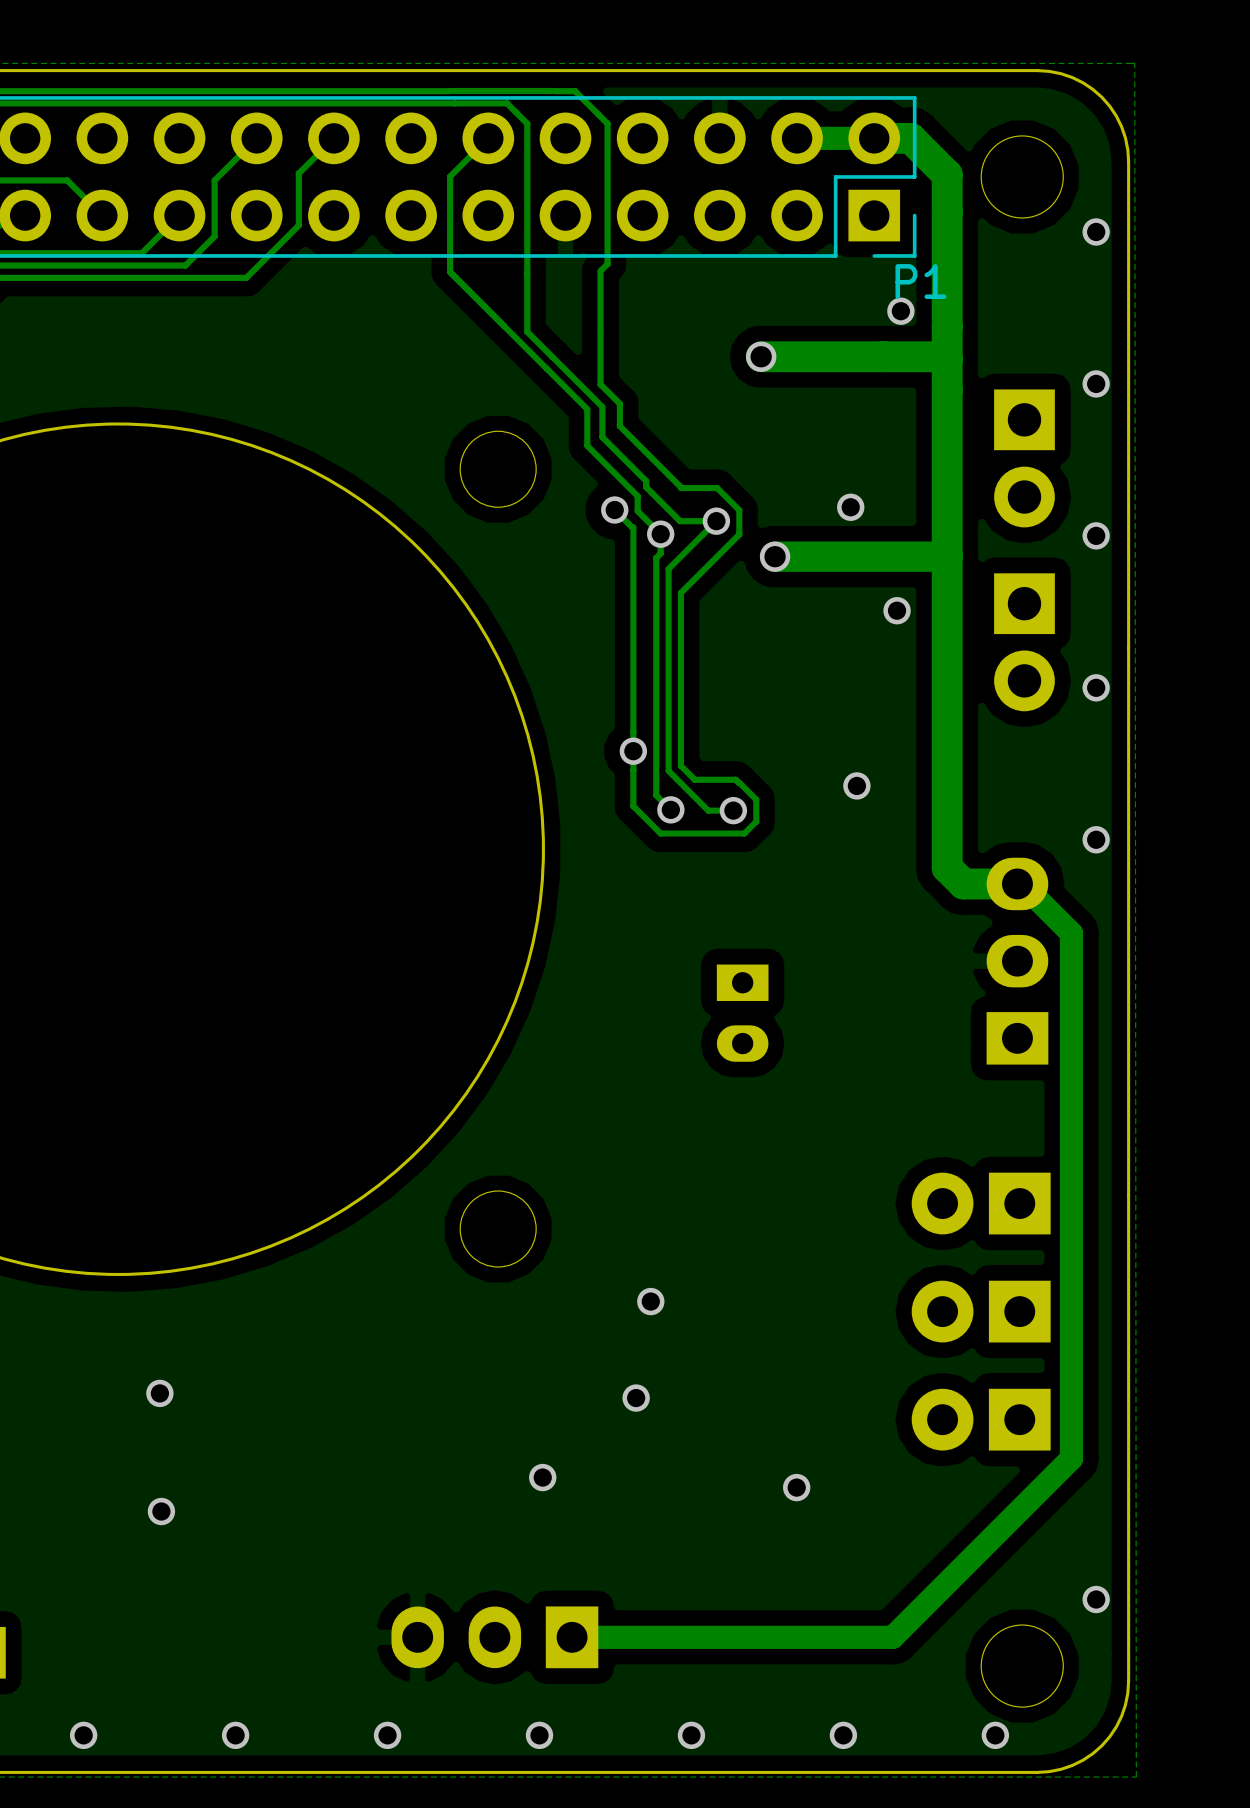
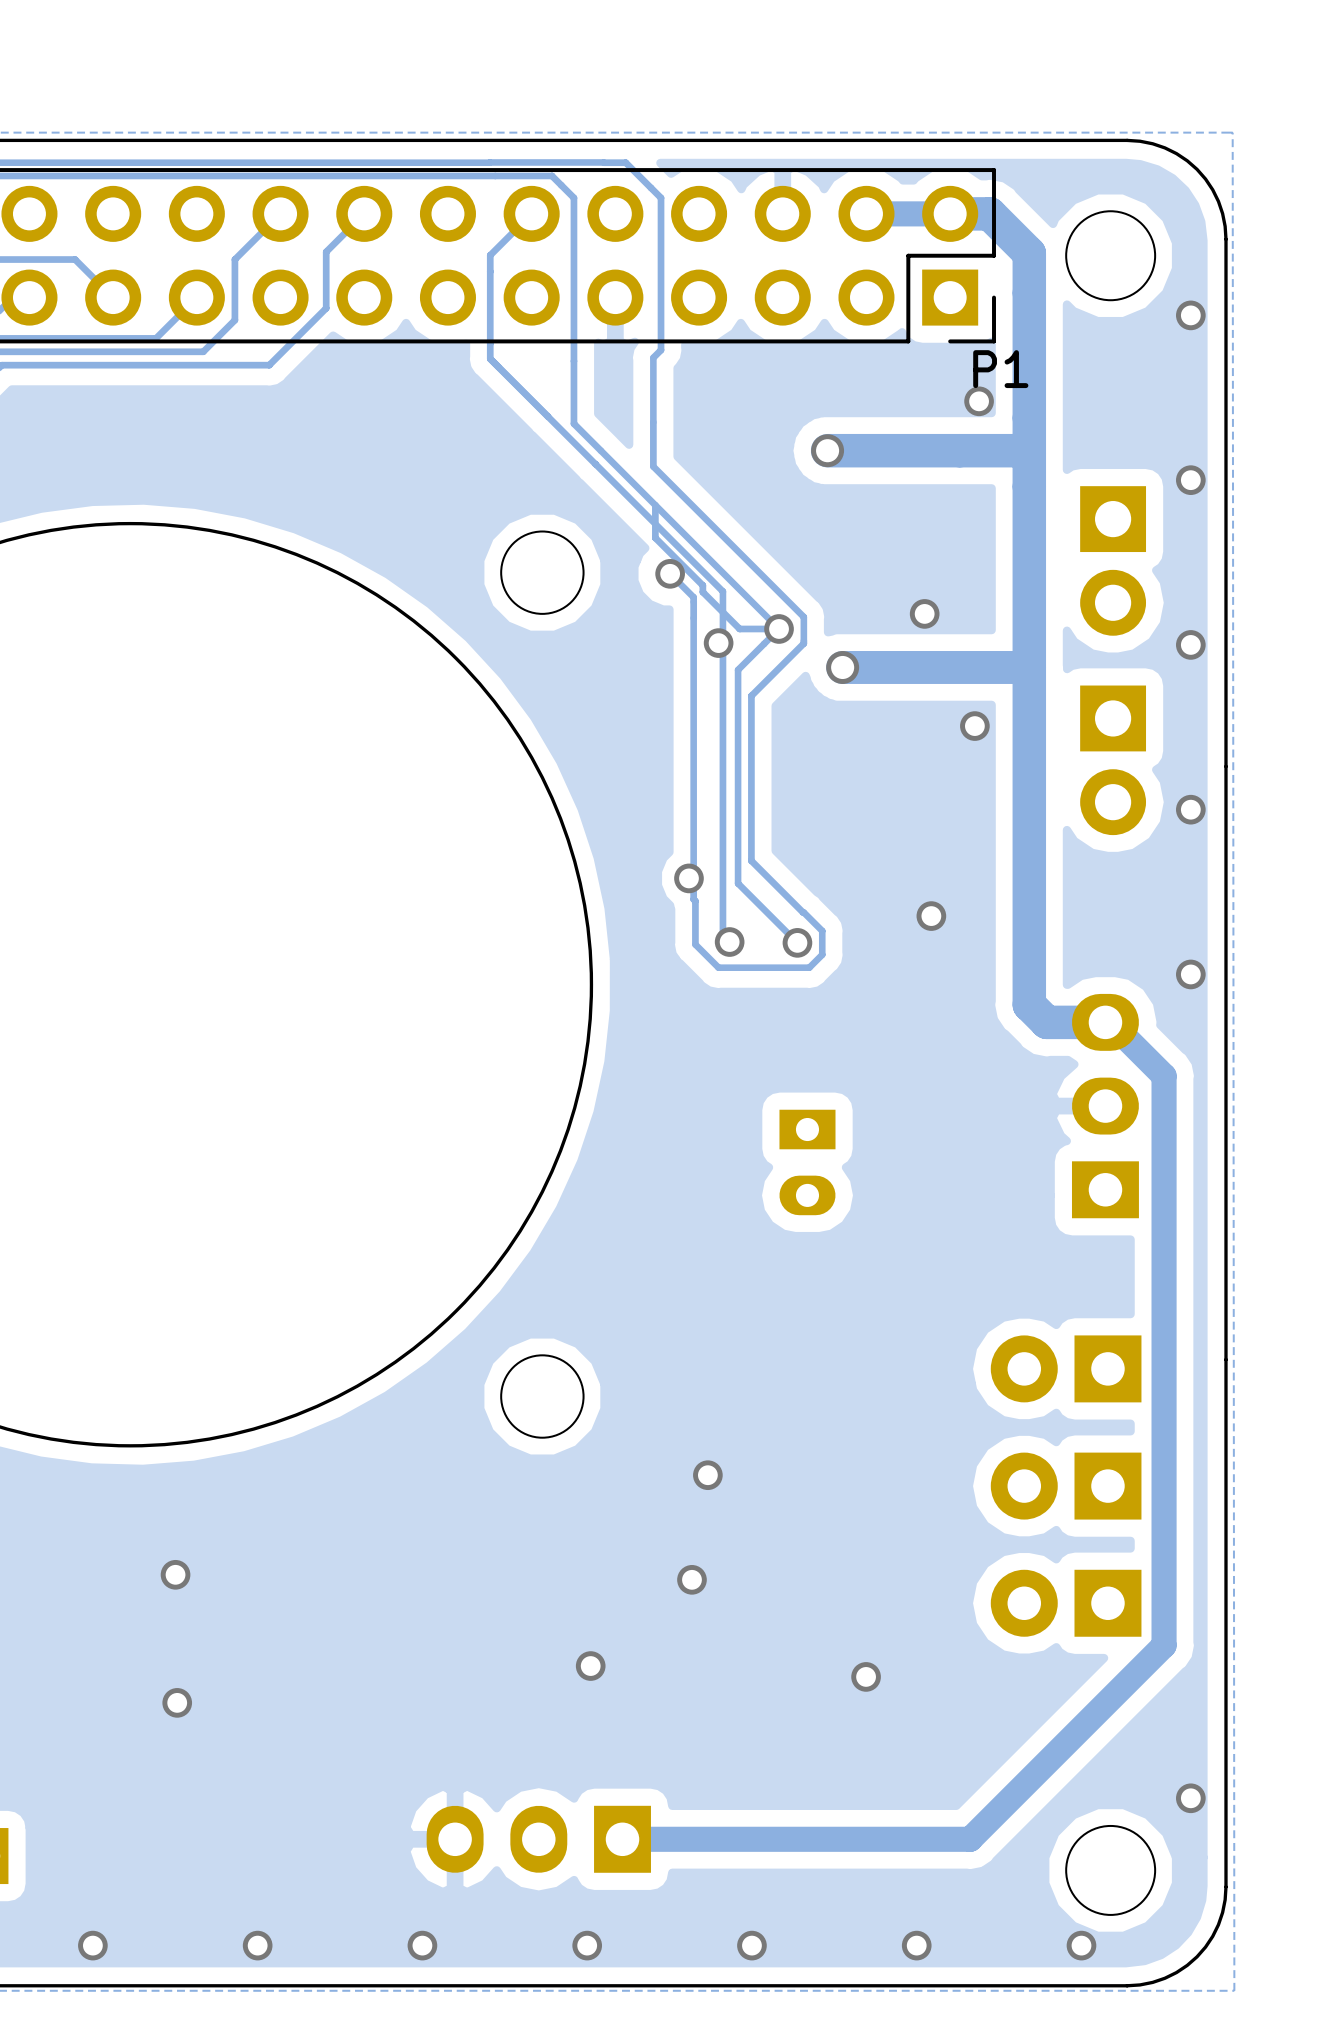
track: (552, 356) (602, 406) -> (600, 450) (779, 628)
track: (600, 371) (600, 384) (619, 403) (619, 426) (681, 487) -> (653, 466) (779, 593)
track: (587, 409) (587, 445) (637, 496) -> (670, 573) (693, 597) (693, 601)
track: (717, 488) (681, 488) -> none
track: (614, 510) (633, 527) (633, 806) (639, 812) -> (693, 618) (693, 899) (695, 901) (695, 944)
via position: (614, 510) -> (670, 573)
track: (637, 511) (660, 534) (660, 553) (656, 557) (656, 795) (664, 803) -> (639, 507) (722, 591) (722, 935)
track: (678, 558) (668, 568) (668, 770) (708, 810) (733, 810) -> (738, 669) (738, 883) (797, 942)
track: (690, 582) (680, 592) (680, 765) (694, 779) (735, 779) -> (751, 695) (751, 860) (799, 909)

